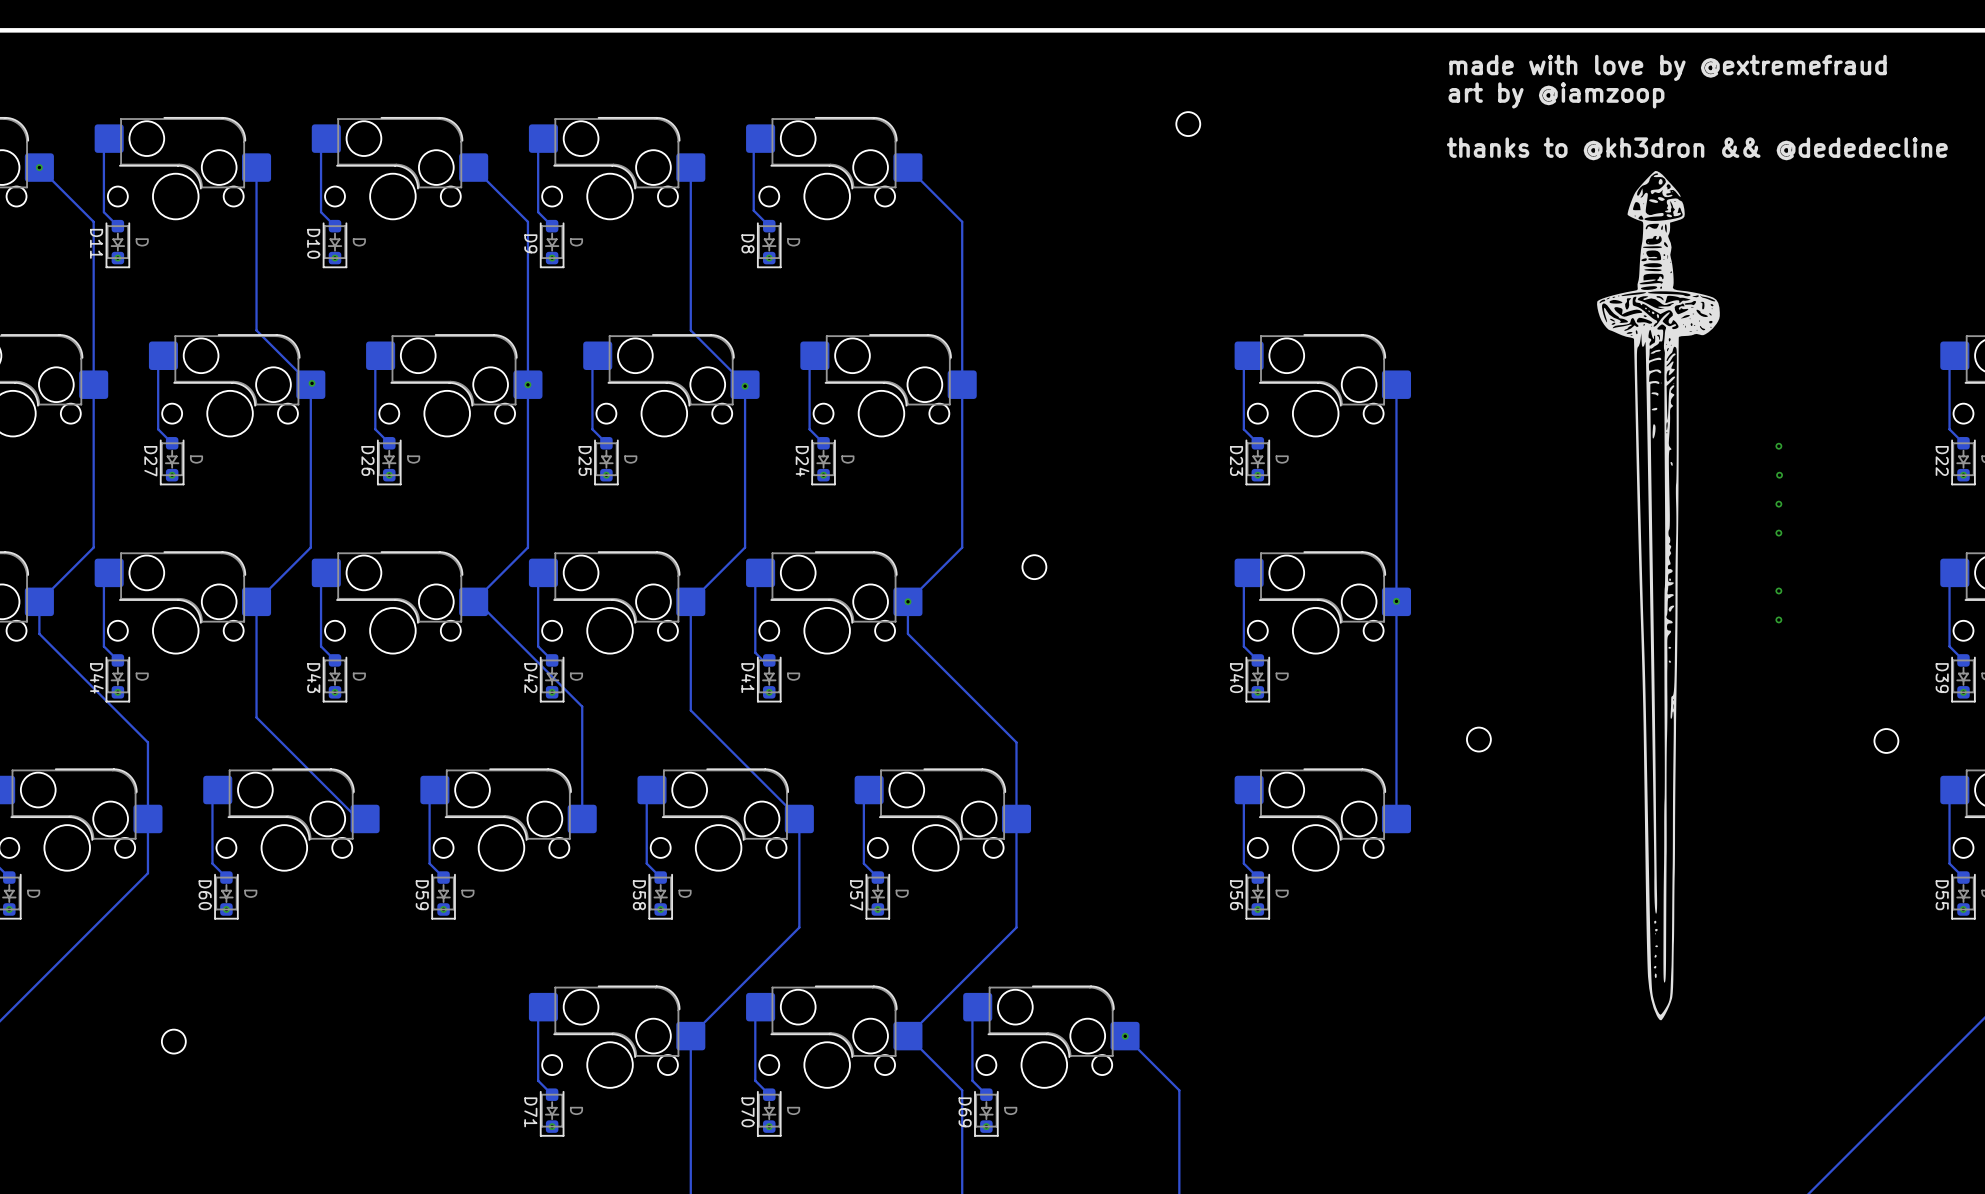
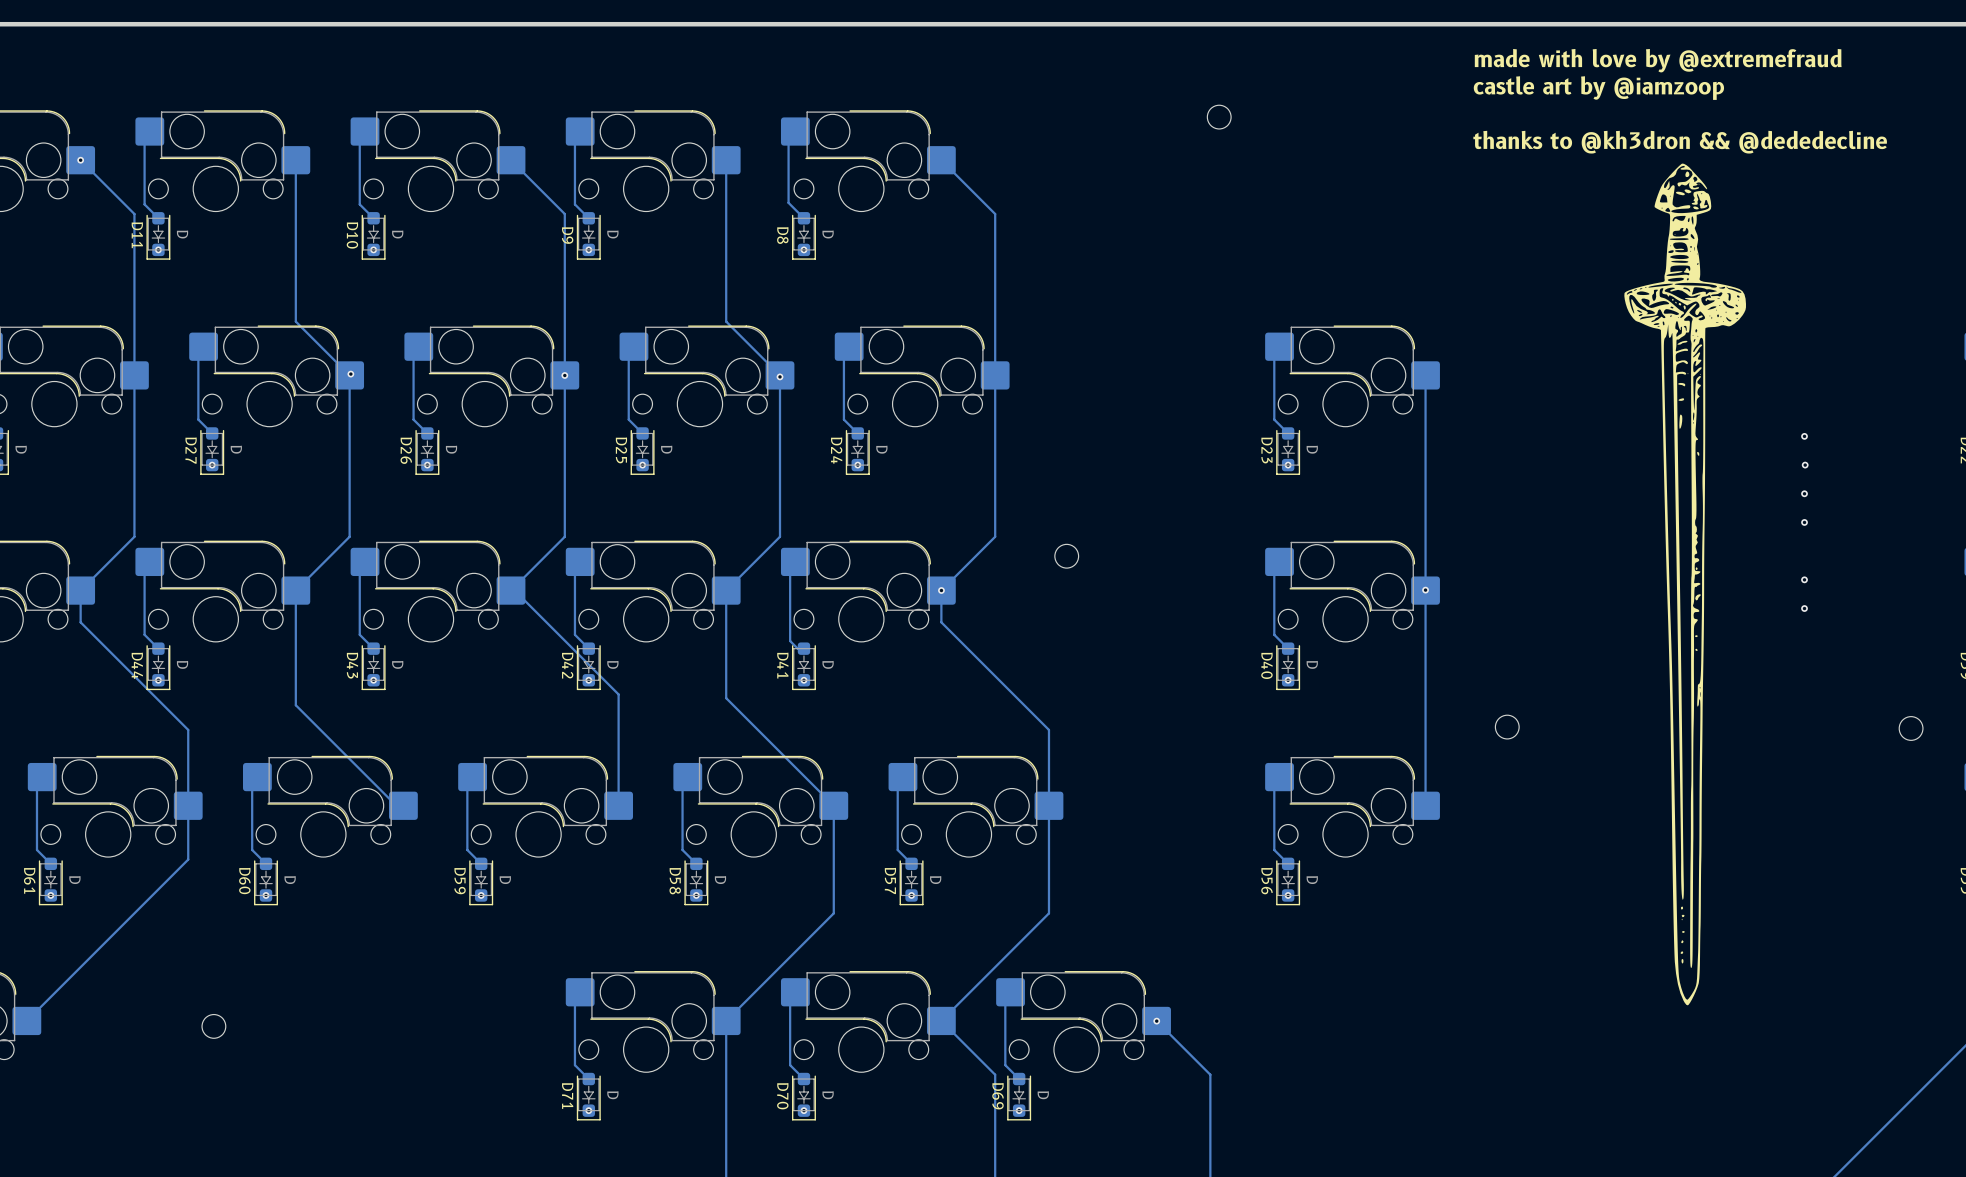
text: art by @iamzoop (1556, 95) -> castle art by @iamzoop (1598, 88)

